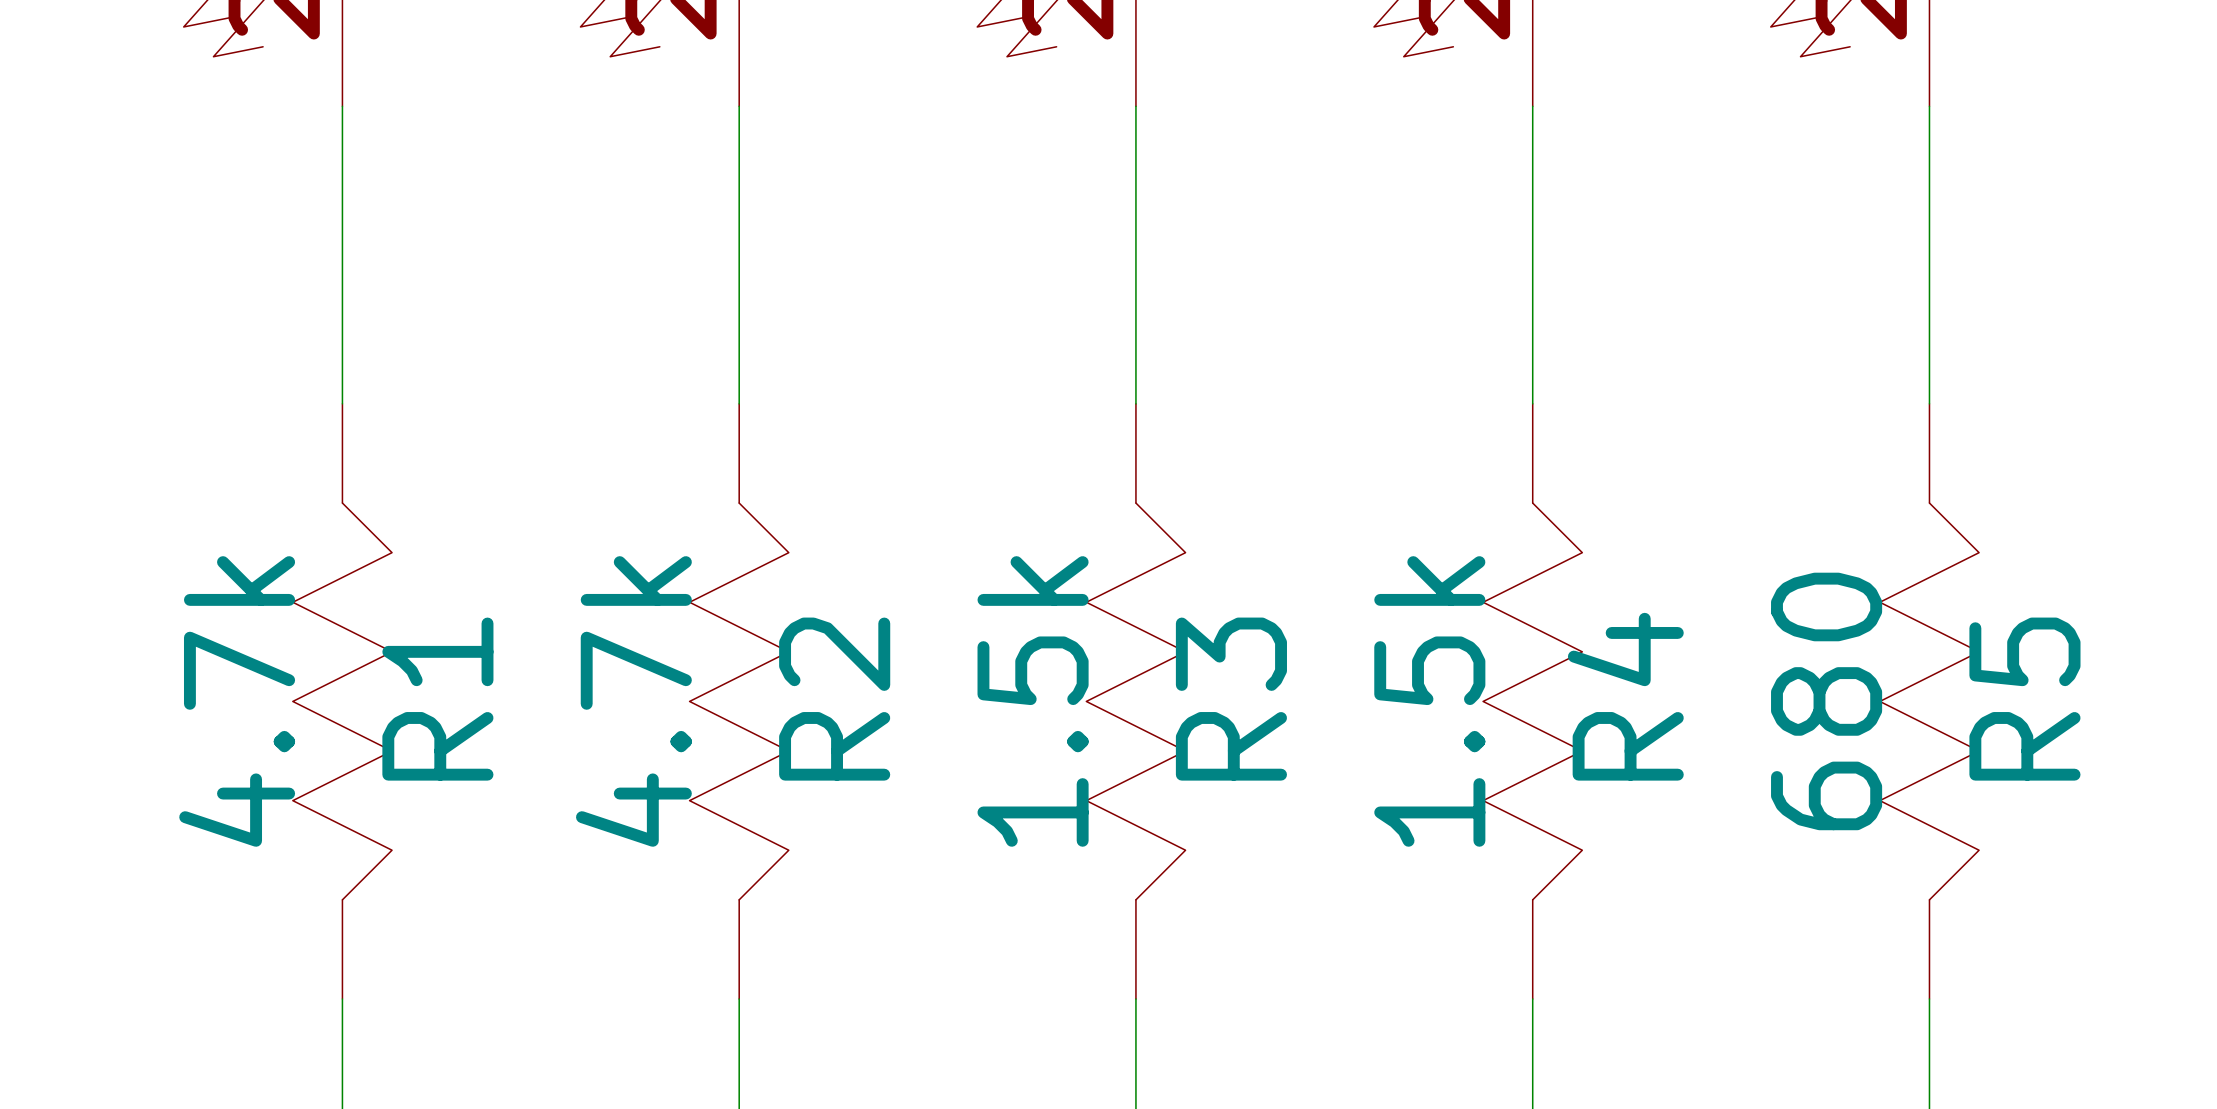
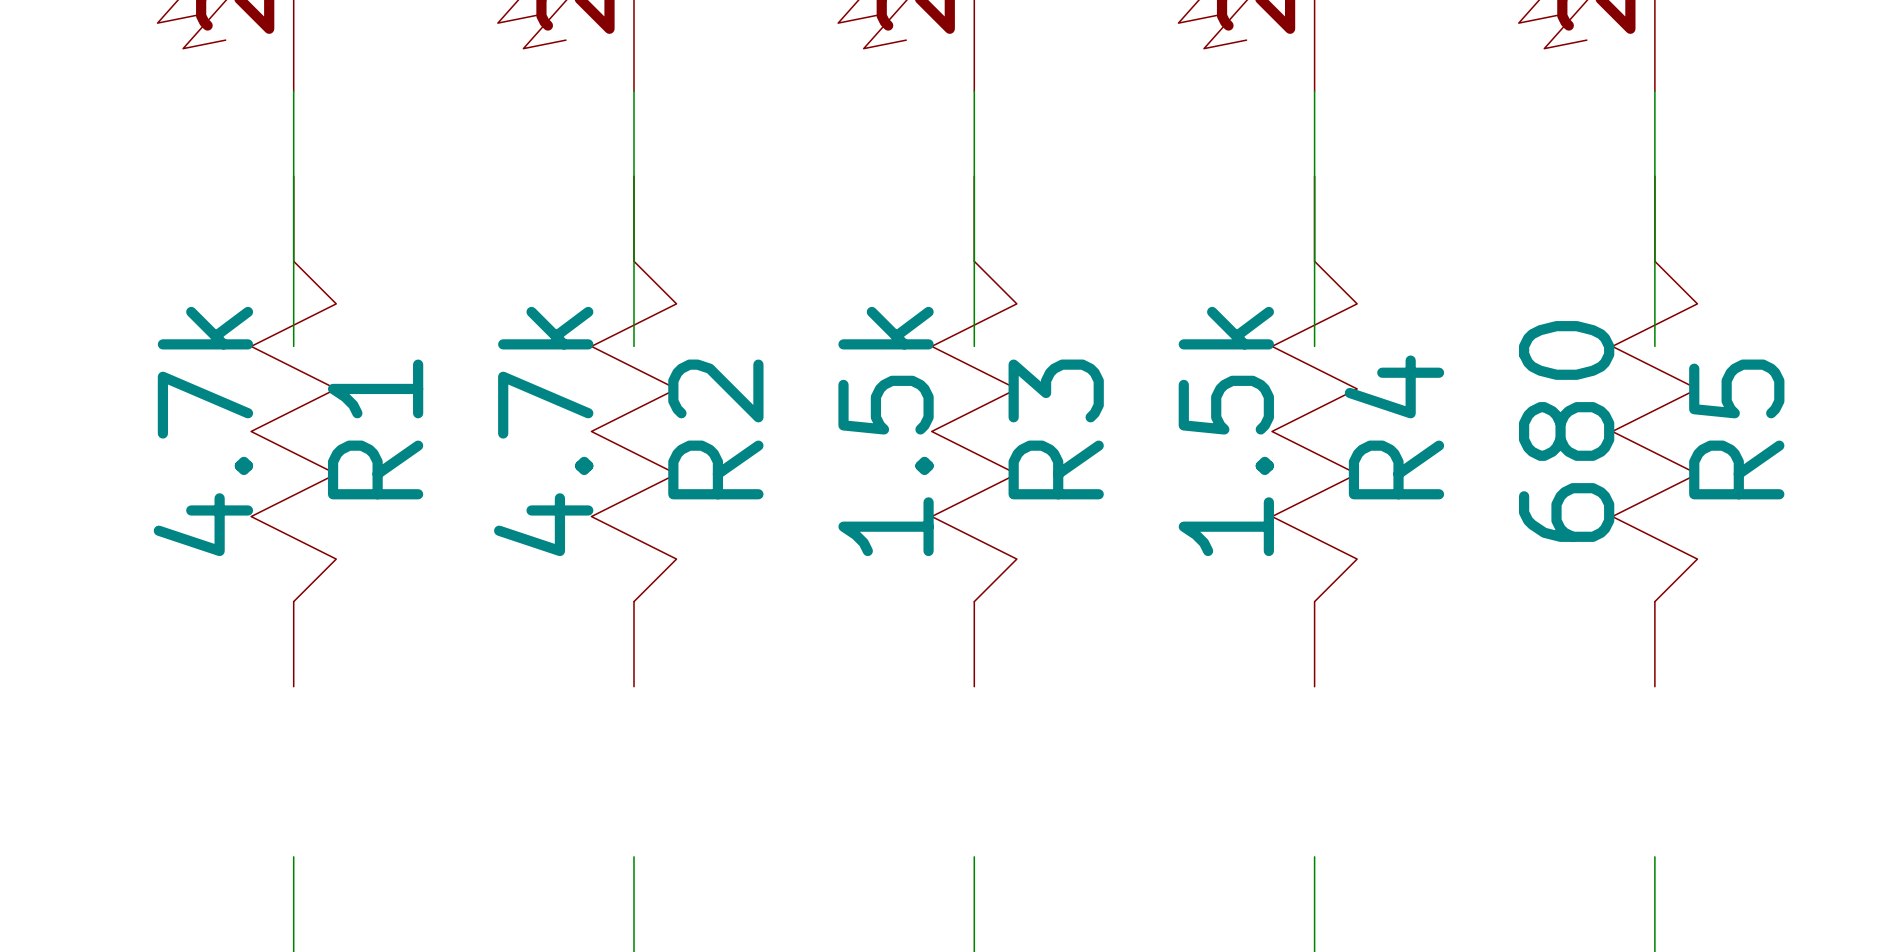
R1 position: (342, 701) -> (293, 431)
R2 position: (739, 701) -> (633, 431)
R3 position: (1135, 701) -> (974, 431)
R4 position: (1532, 701) -> (1314, 431)
R5 position: (1929, 701) -> (1654, 431)

